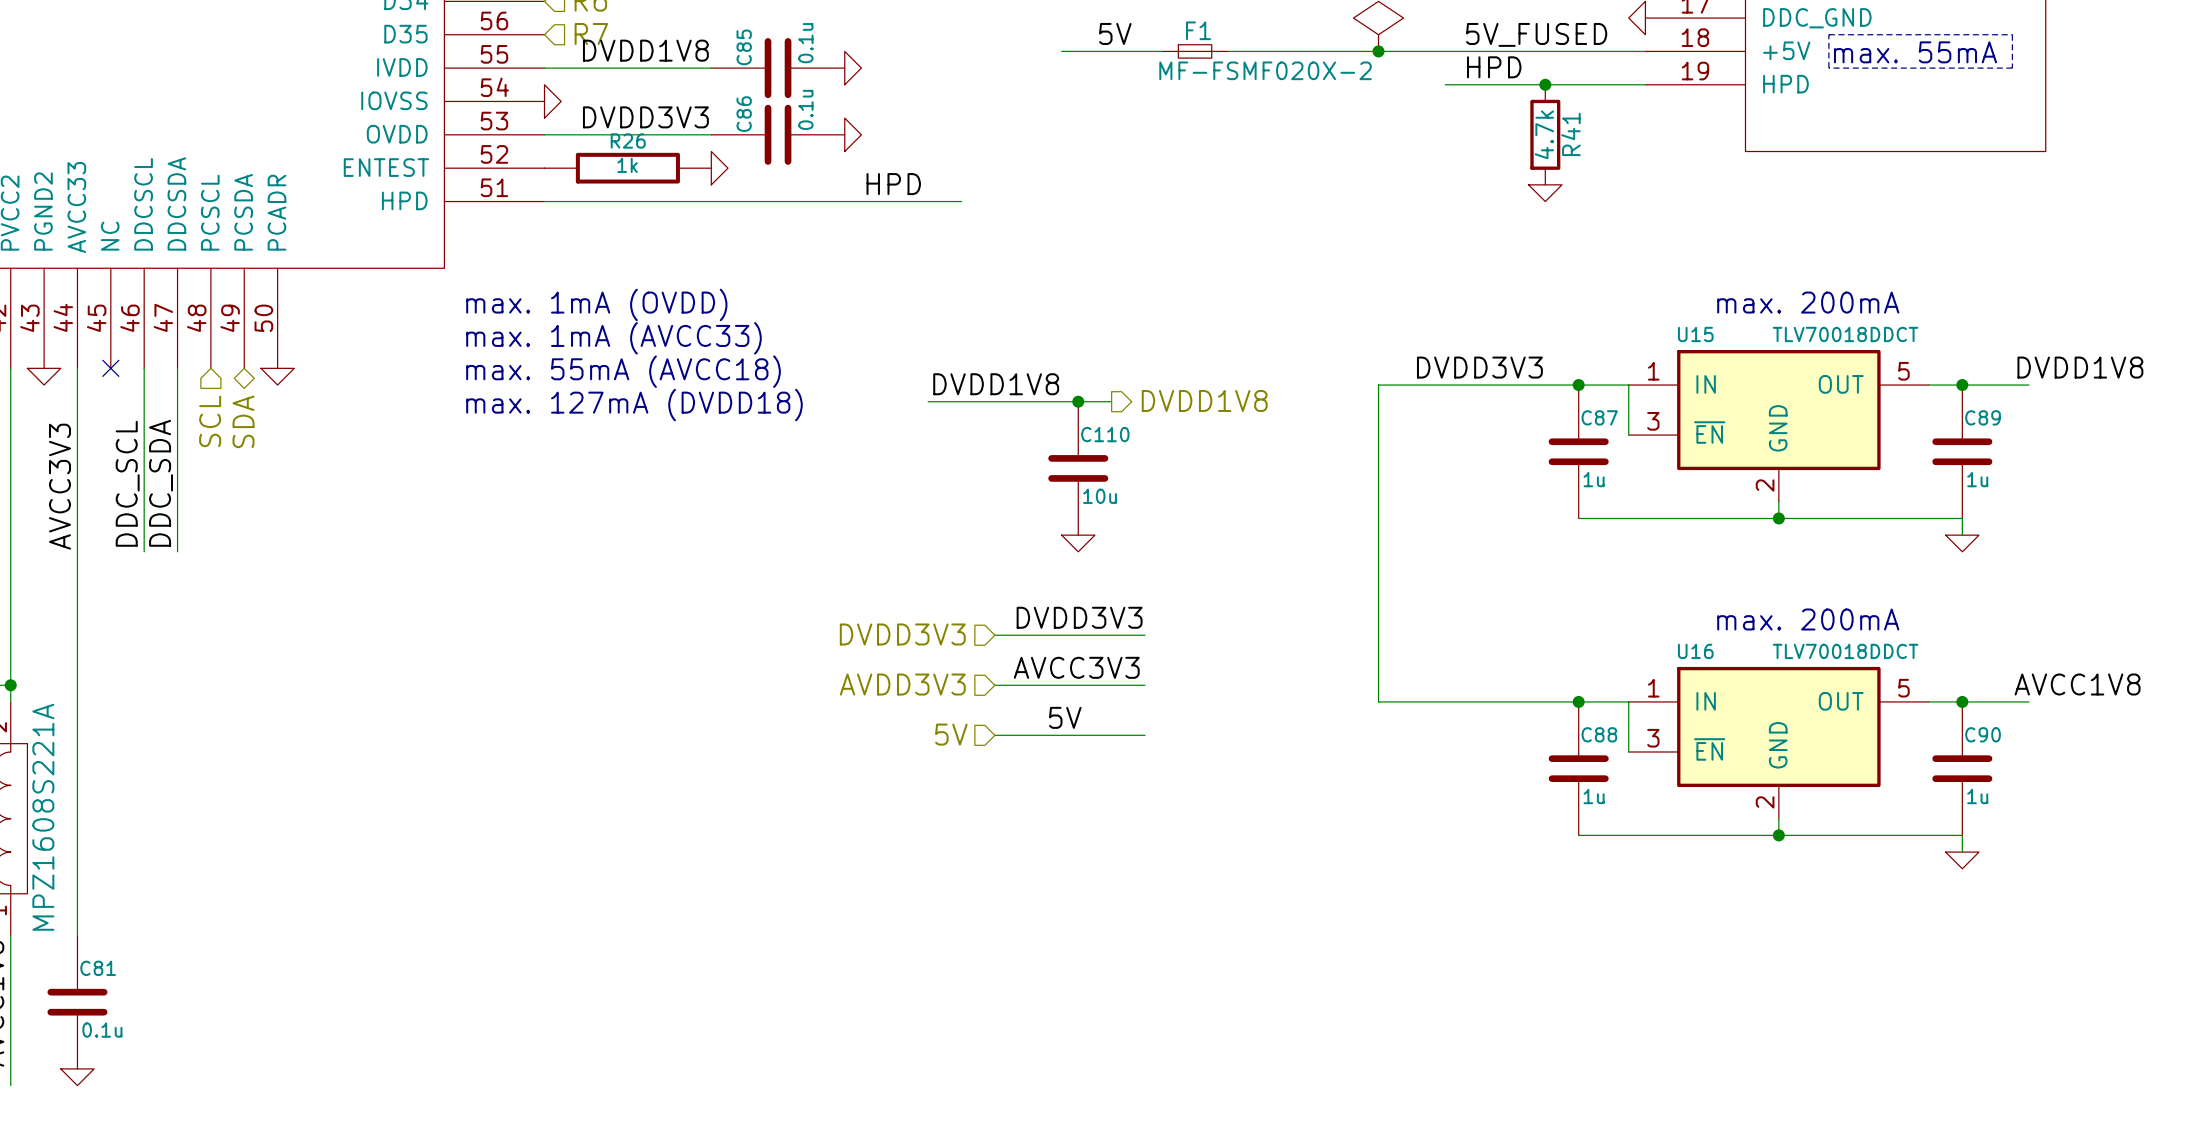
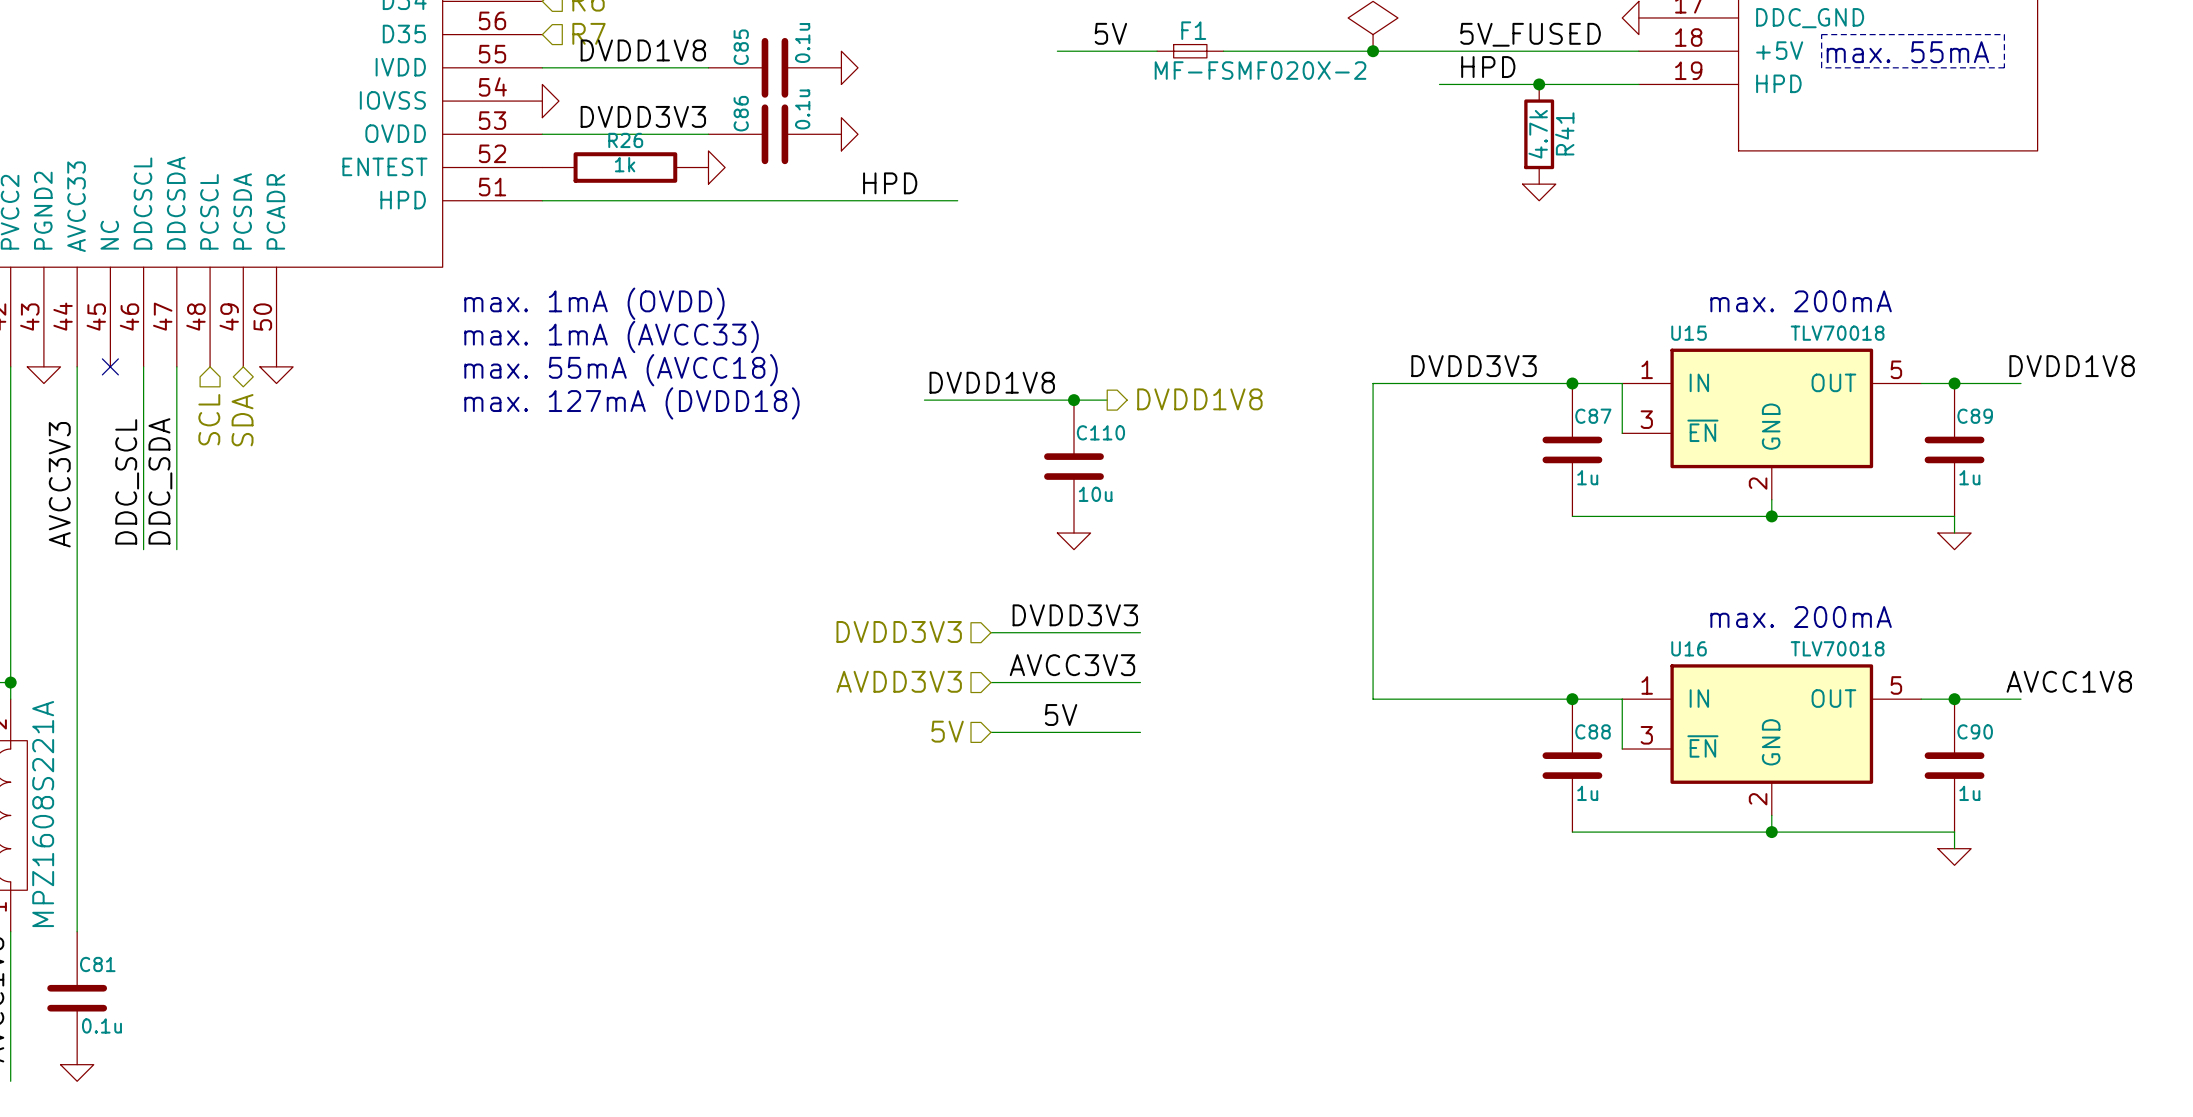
U15 value: TLV70018DDCT (1845, 334) -> TLV70018 (1837, 333)
U16 value: TLV70018DDCT (1845, 651) -> TLV70018 (1837, 648)

